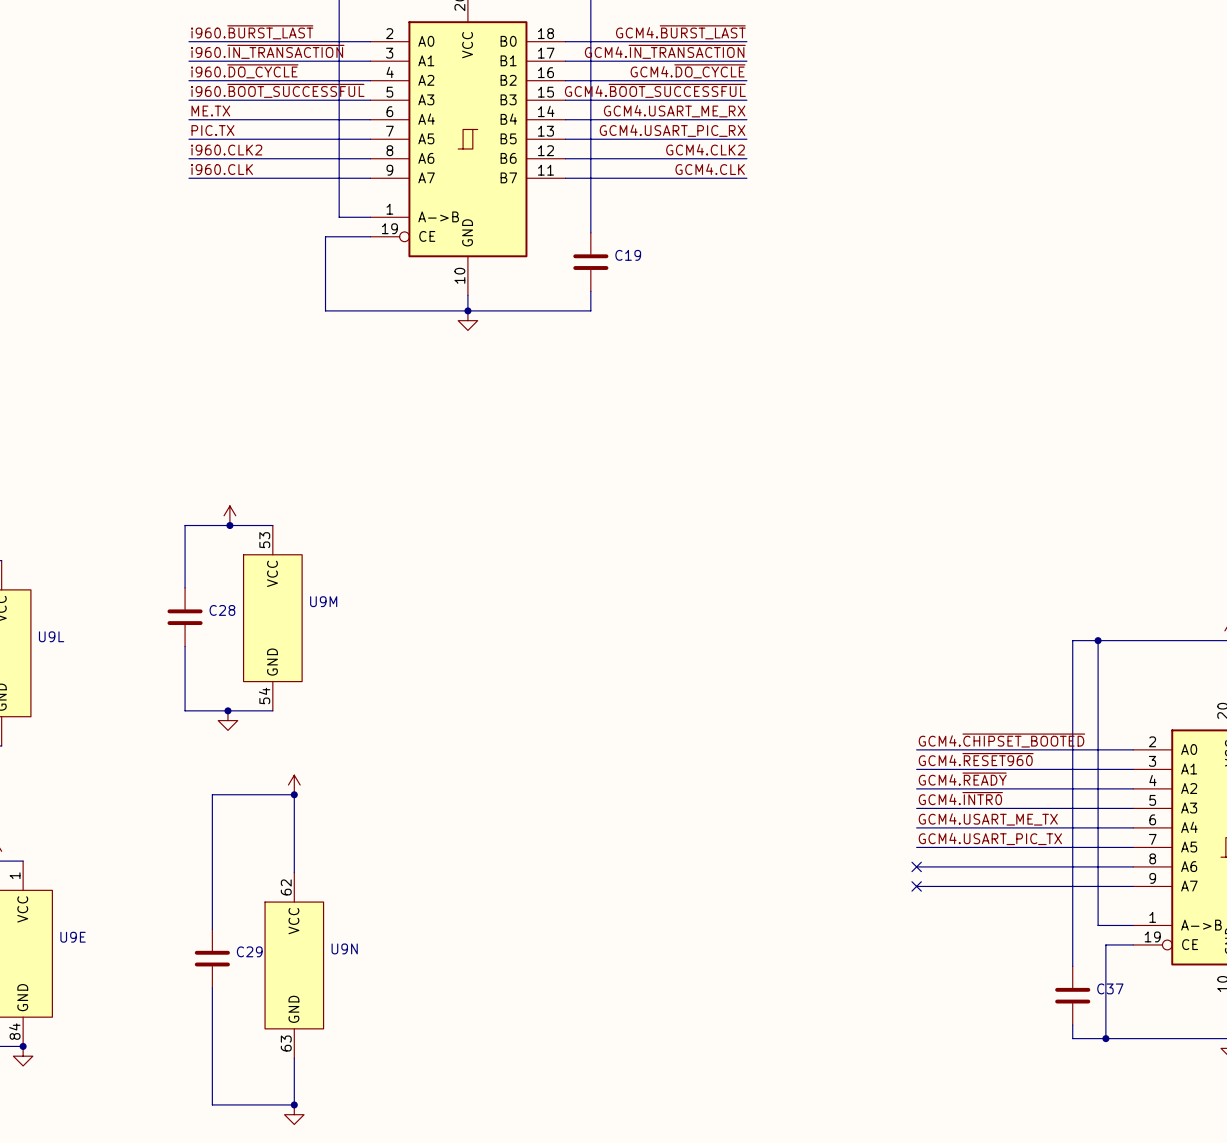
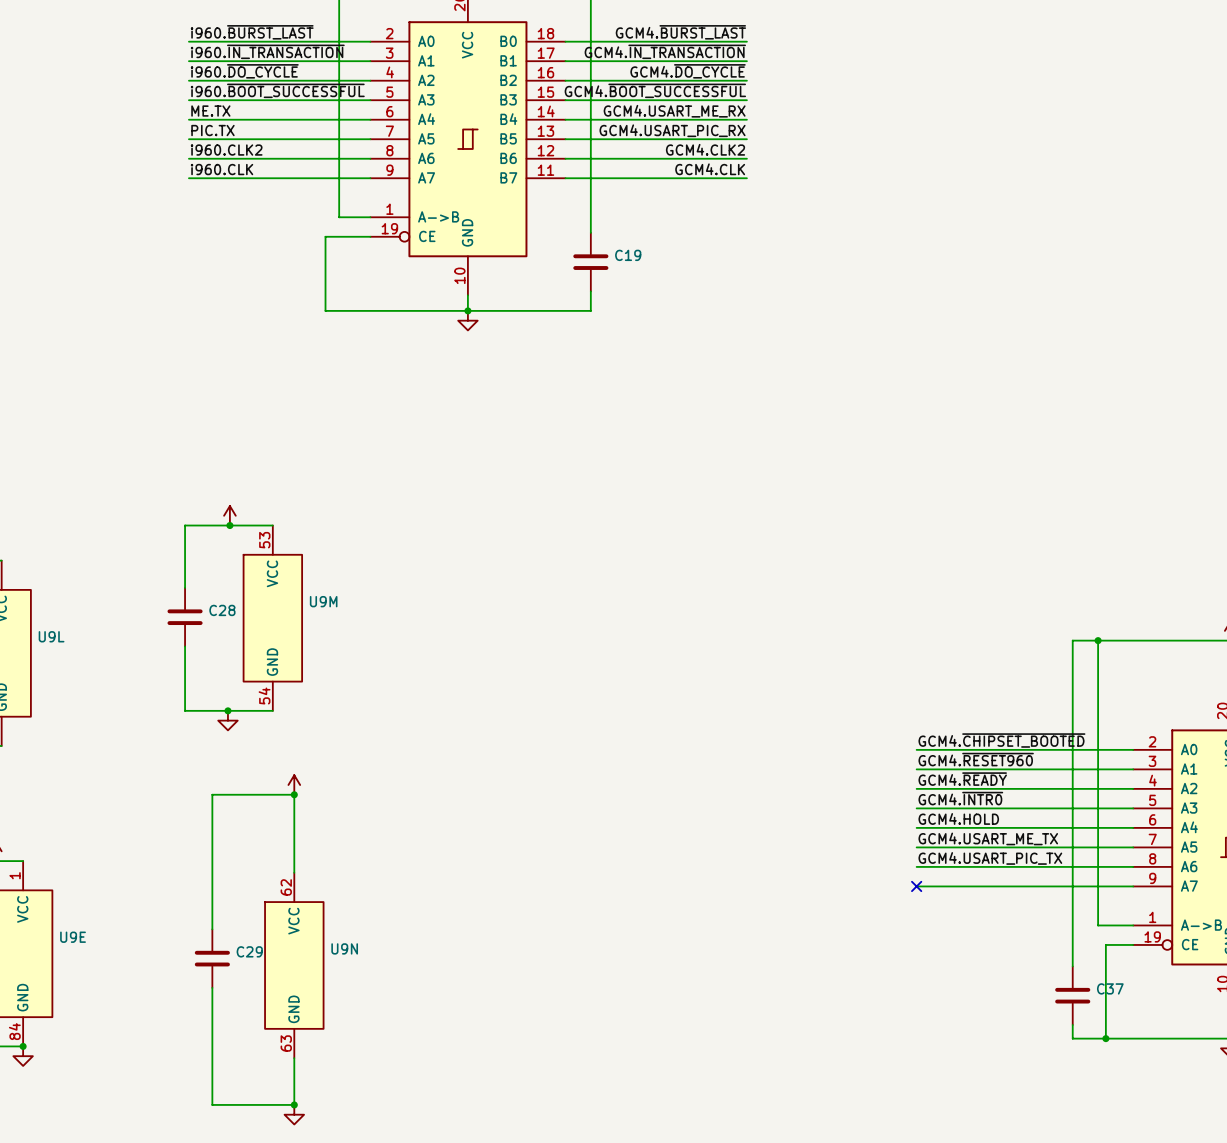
label: GCM4.USART_ME_TX (988, 819) -> GCM4.HOLD (958, 818)
label: GCM4.USART_PIC_TX (990, 838) -> GCM4.USART_ME_TX (988, 838)
label: none -> GCM4.USART_PIC_TX (990, 858)
no-connect mark: (916, 866) -> none

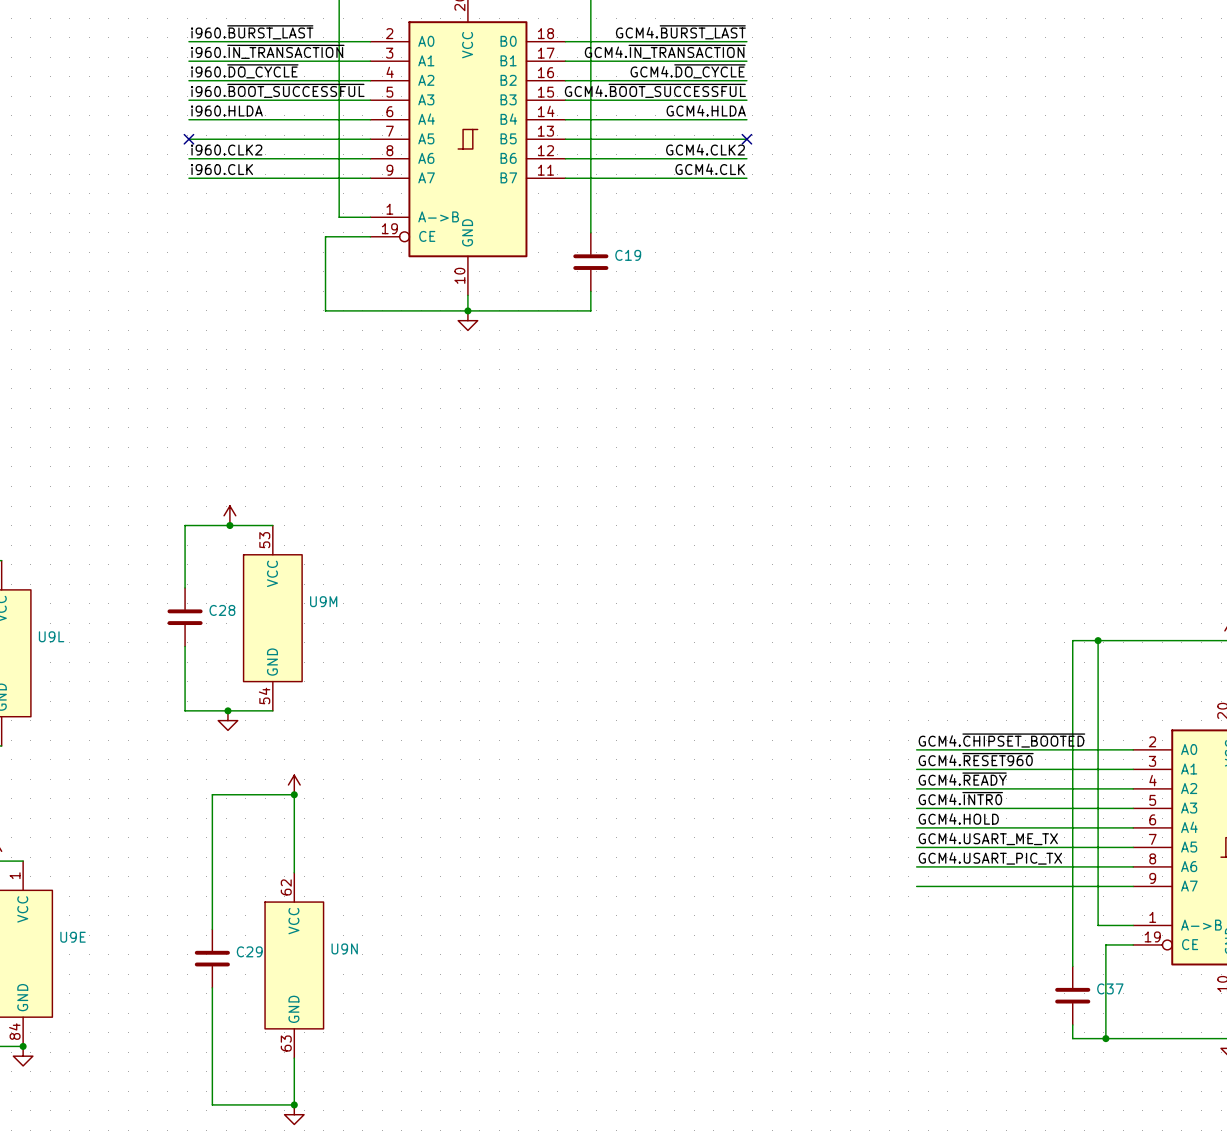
label: ME.TX (210, 111) -> i960.HLDA (226, 111)
label: GCM4.USART_ME_RX (674, 111) -> GCM4.HLDA (706, 110)
label: PIC.TX (212, 130) -> none
label: GCM4.USART_PIC_RX (672, 130) -> none
no-connect mark: none -> (188, 139)
no-connect mark: none -> (746, 139)
no-connect mark: (916, 886) -> none

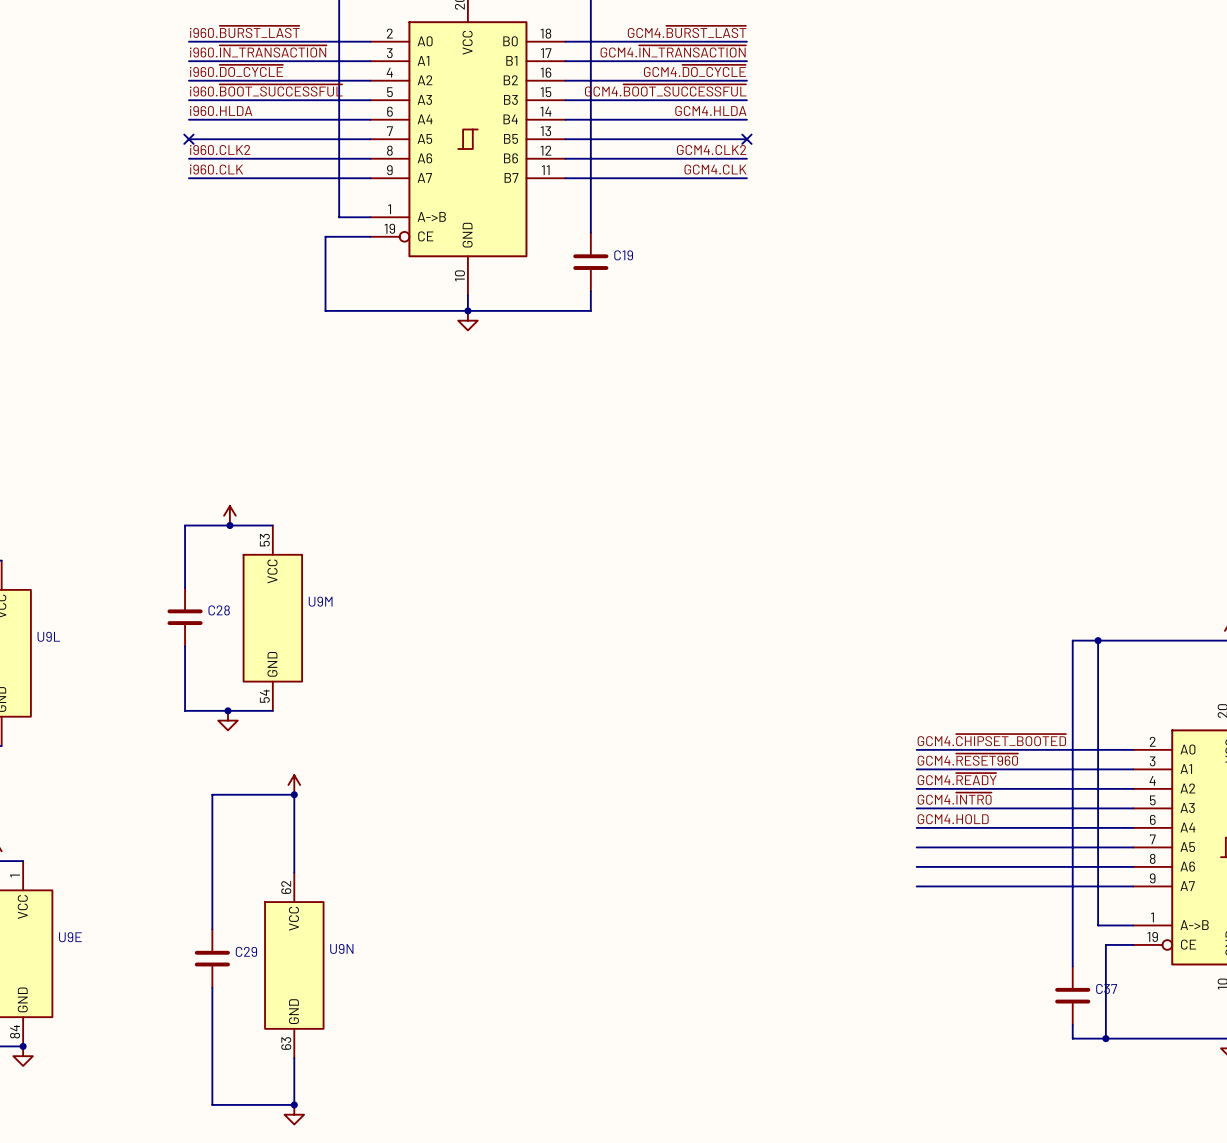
label: GCM4.USART_ME_TX (988, 838) -> none
label: GCM4.USART_PIC_TX (990, 858) -> none

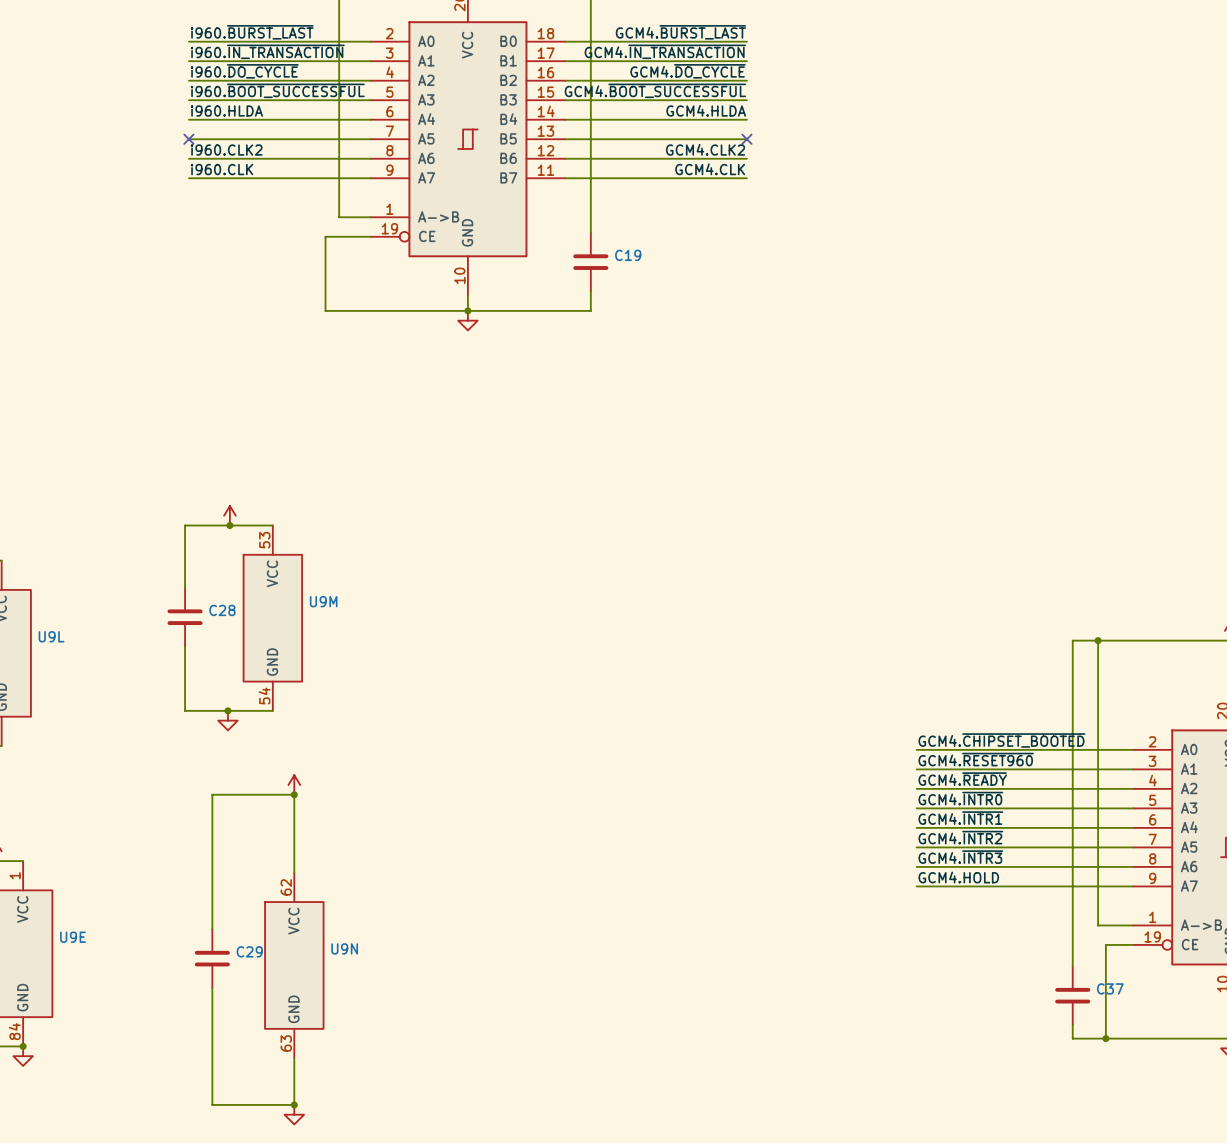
label: GCM4.HOLD (953, 819) -> GCM4.~{INTR1} (960, 818)
label: none -> GCM4.~{INTR2} (960, 837)
label: none -> GCM4.~{INTR3} (960, 857)
label: none -> GCM4.HOLD (958, 877)

